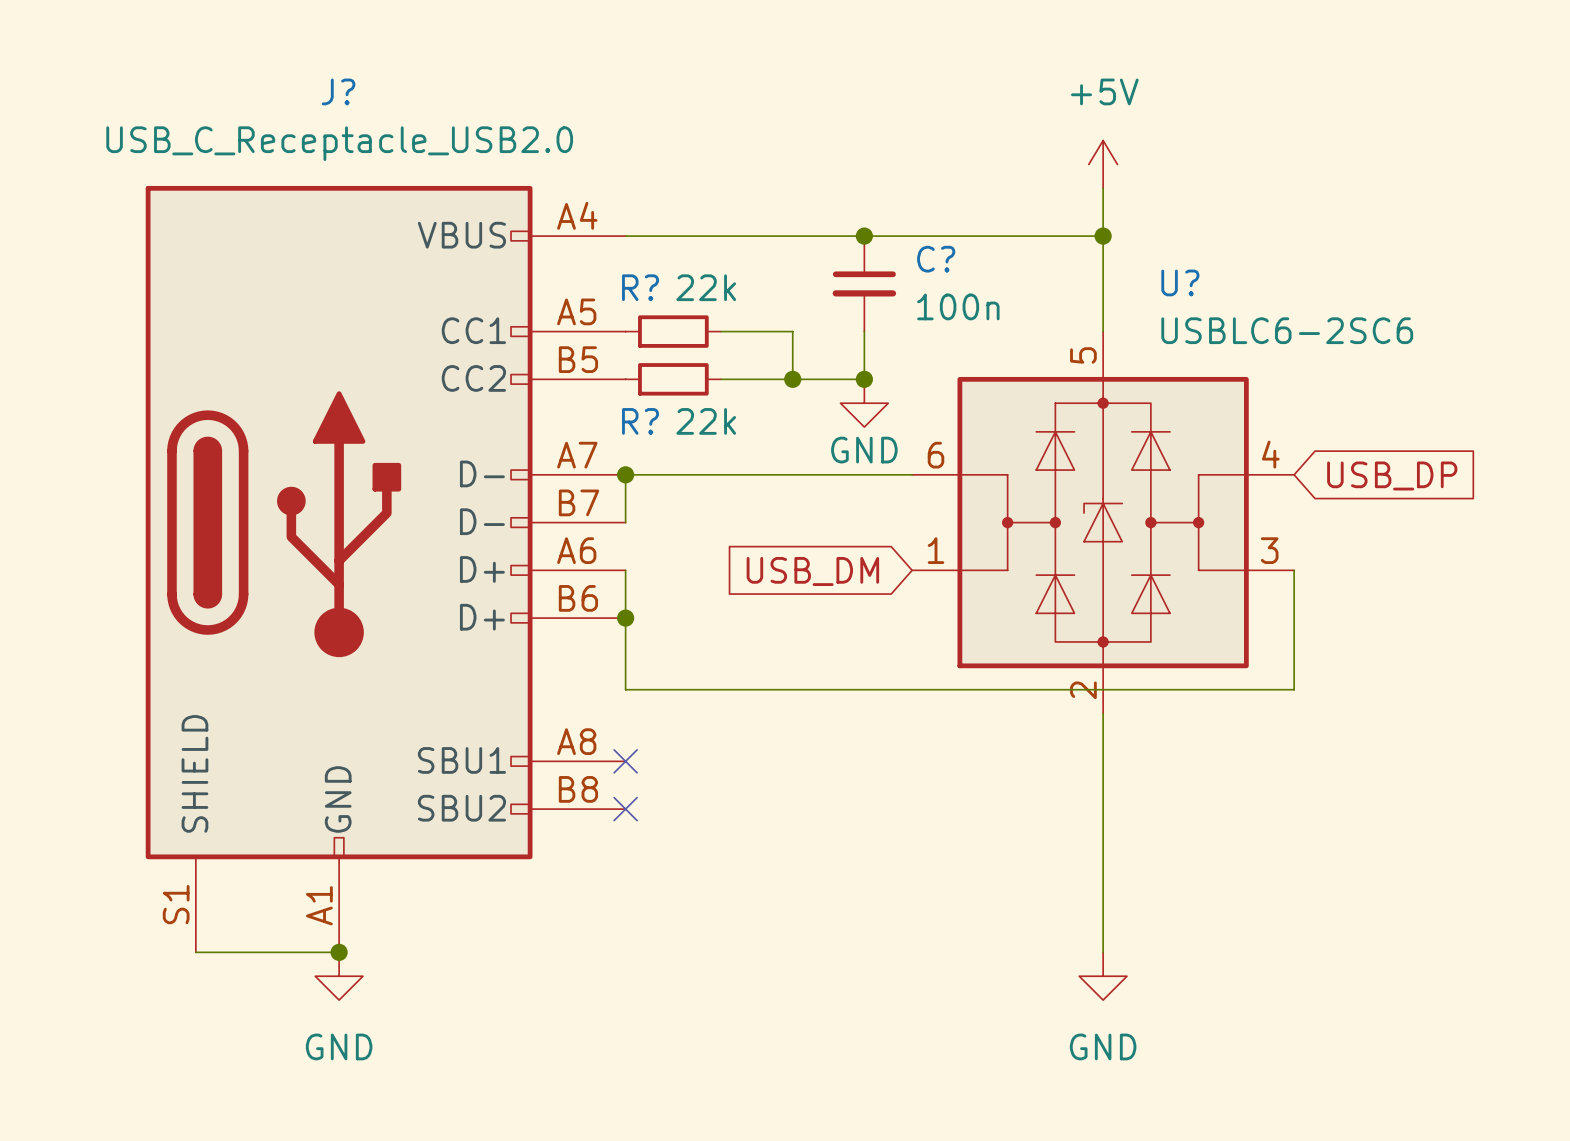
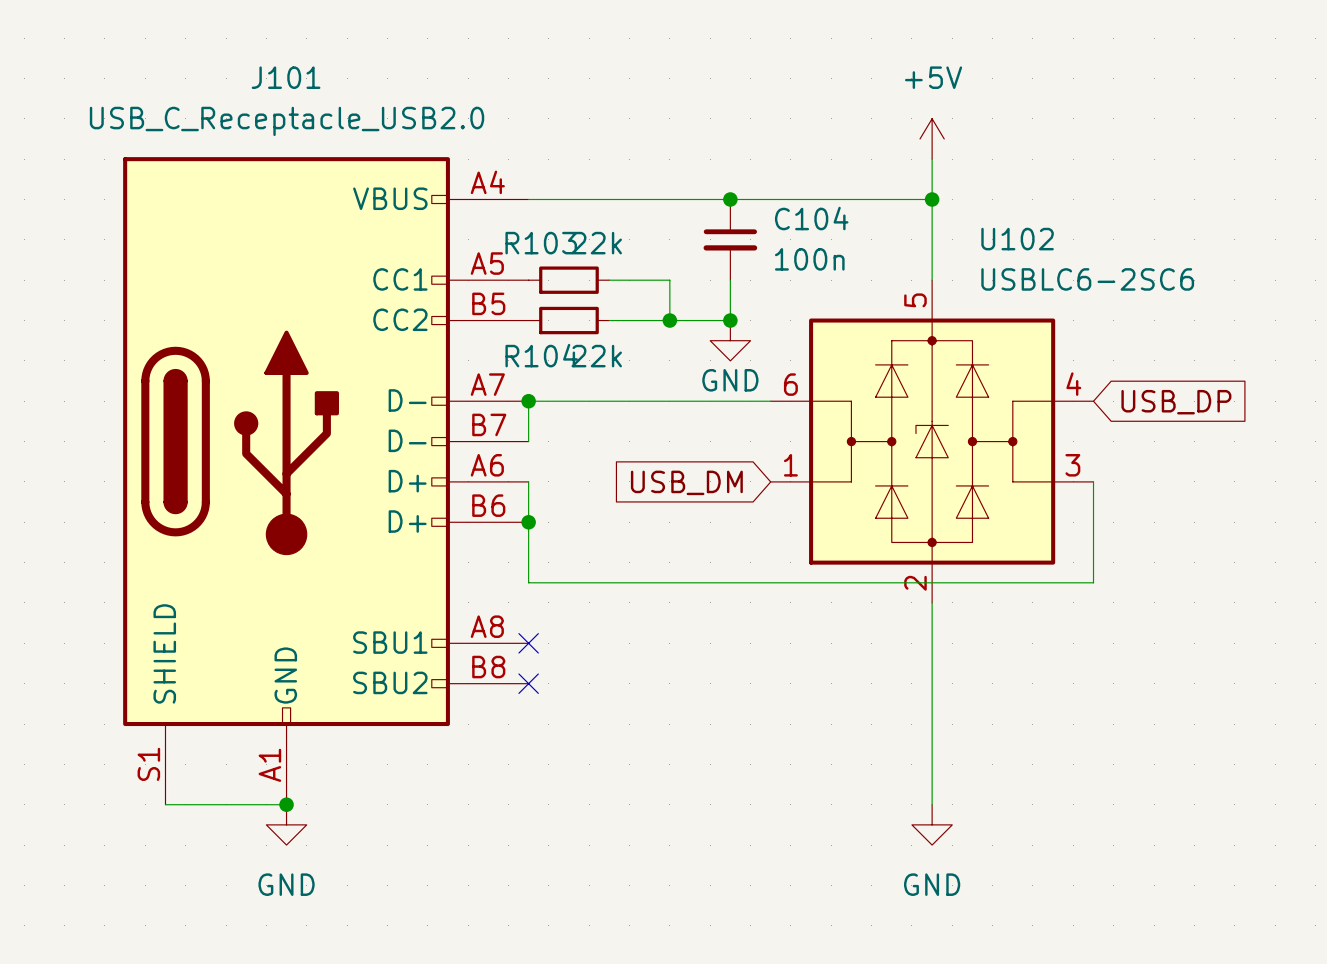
J? name: J? (338, 91) -> J101 (286, 77)
C? name: C? (936, 259) -> C104 (811, 218)
U? name: U? (1180, 282) -> U102 (1017, 239)
R? name: R? (640, 287) -> R103 (541, 243)
R? name: R? (640, 421) -> R104 (541, 355)

